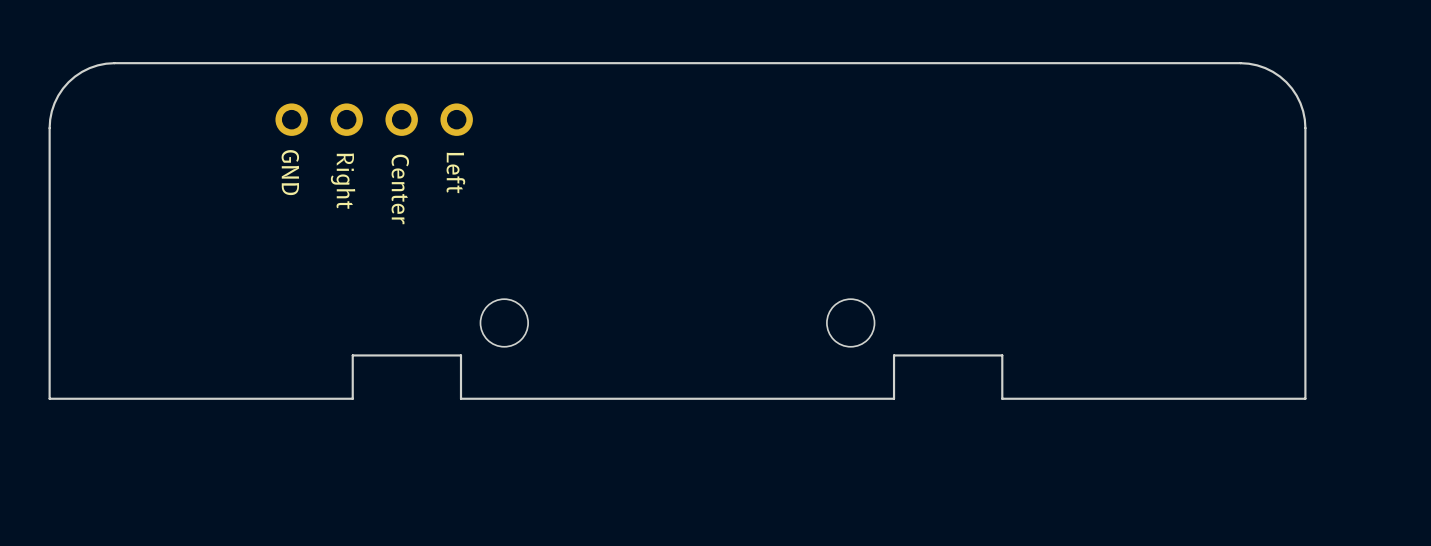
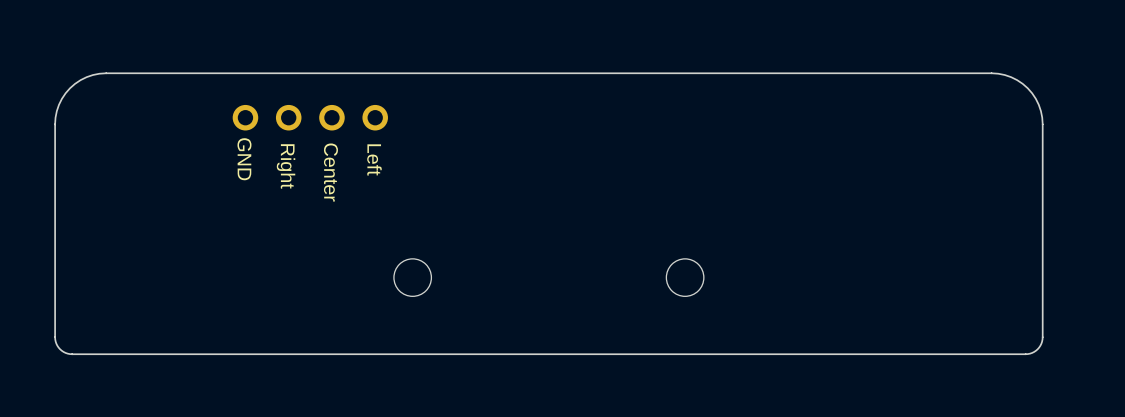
board edge: (1305, 398) (1002, 398) (1002, 355) (894, 355) (894, 398) (461, 398) (461, 355) (352, 355) (352, 398) (49, 398) -> (1042, 337) (1037, 349) (1025, 354) (72, 354) (60, 349) (55, 337)

